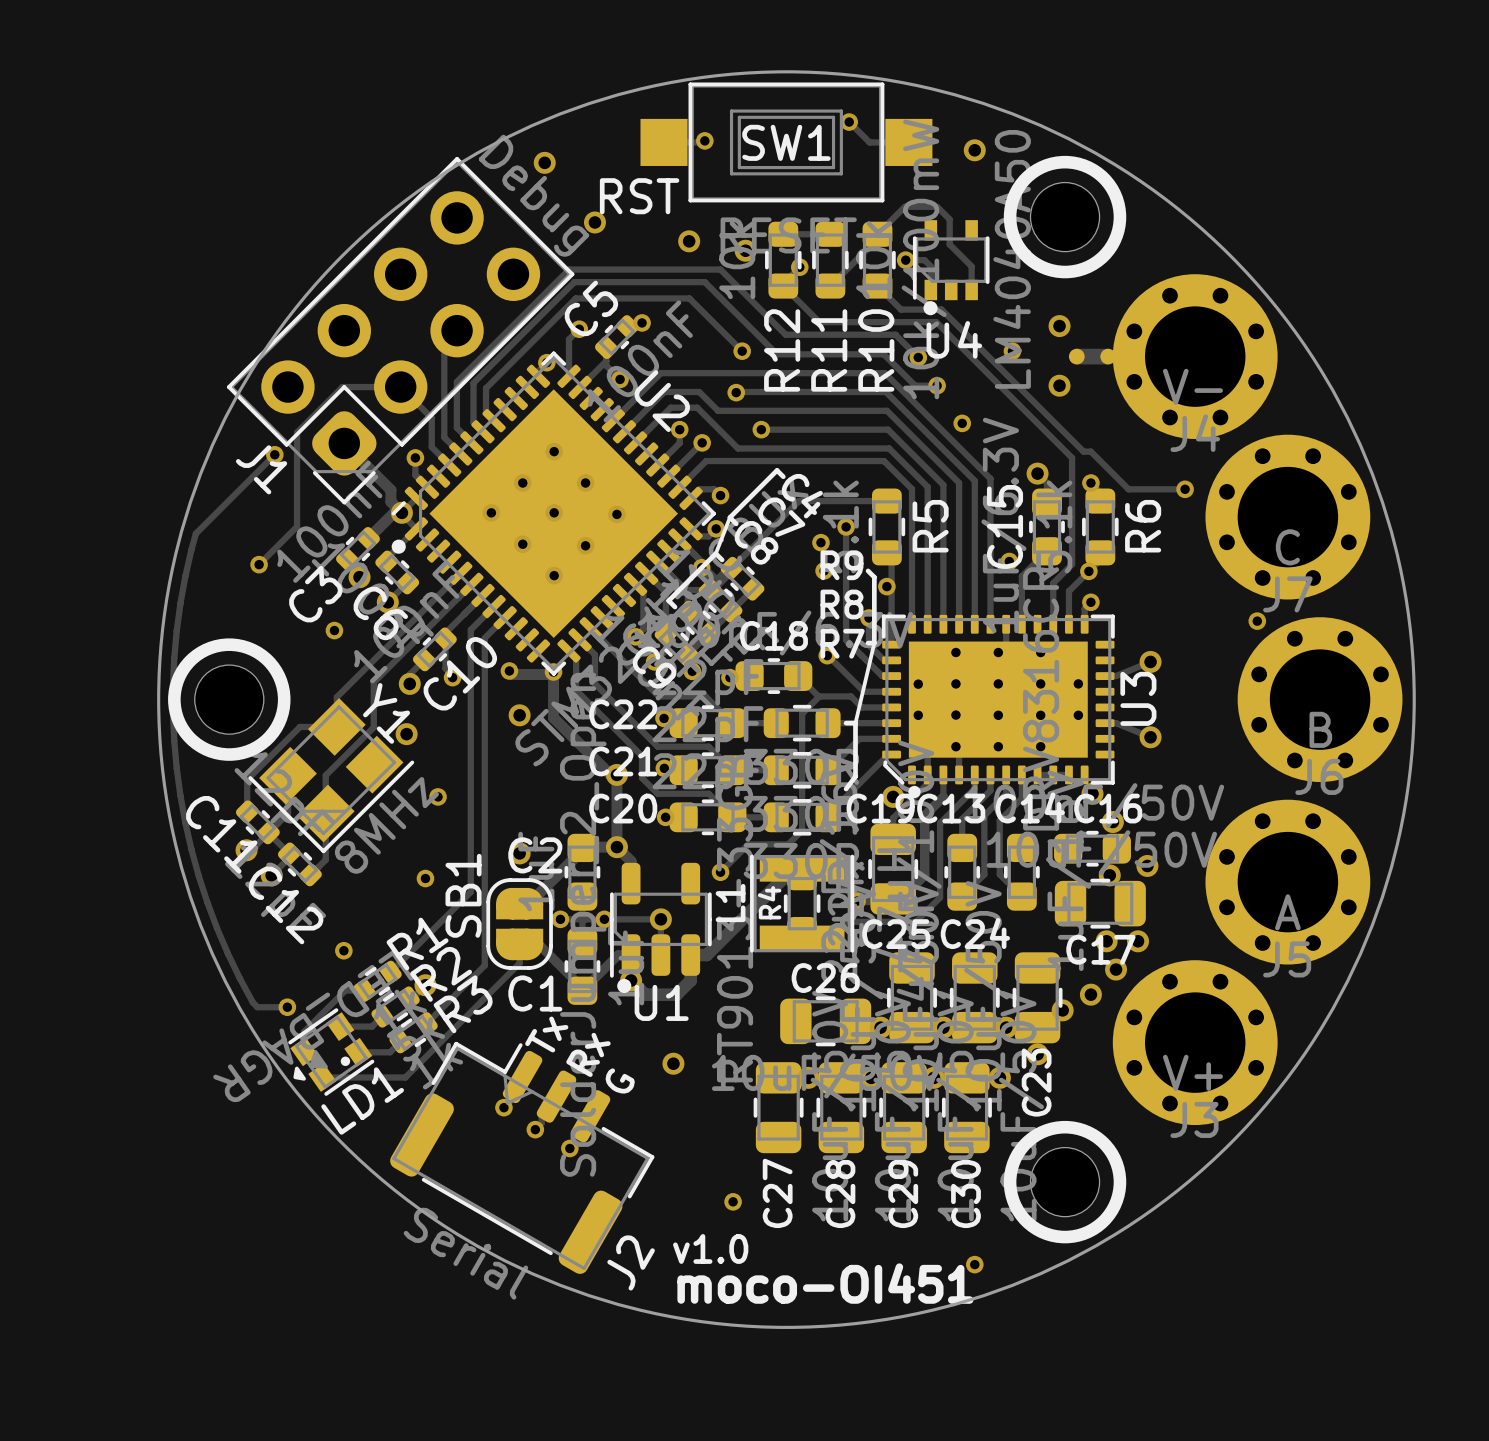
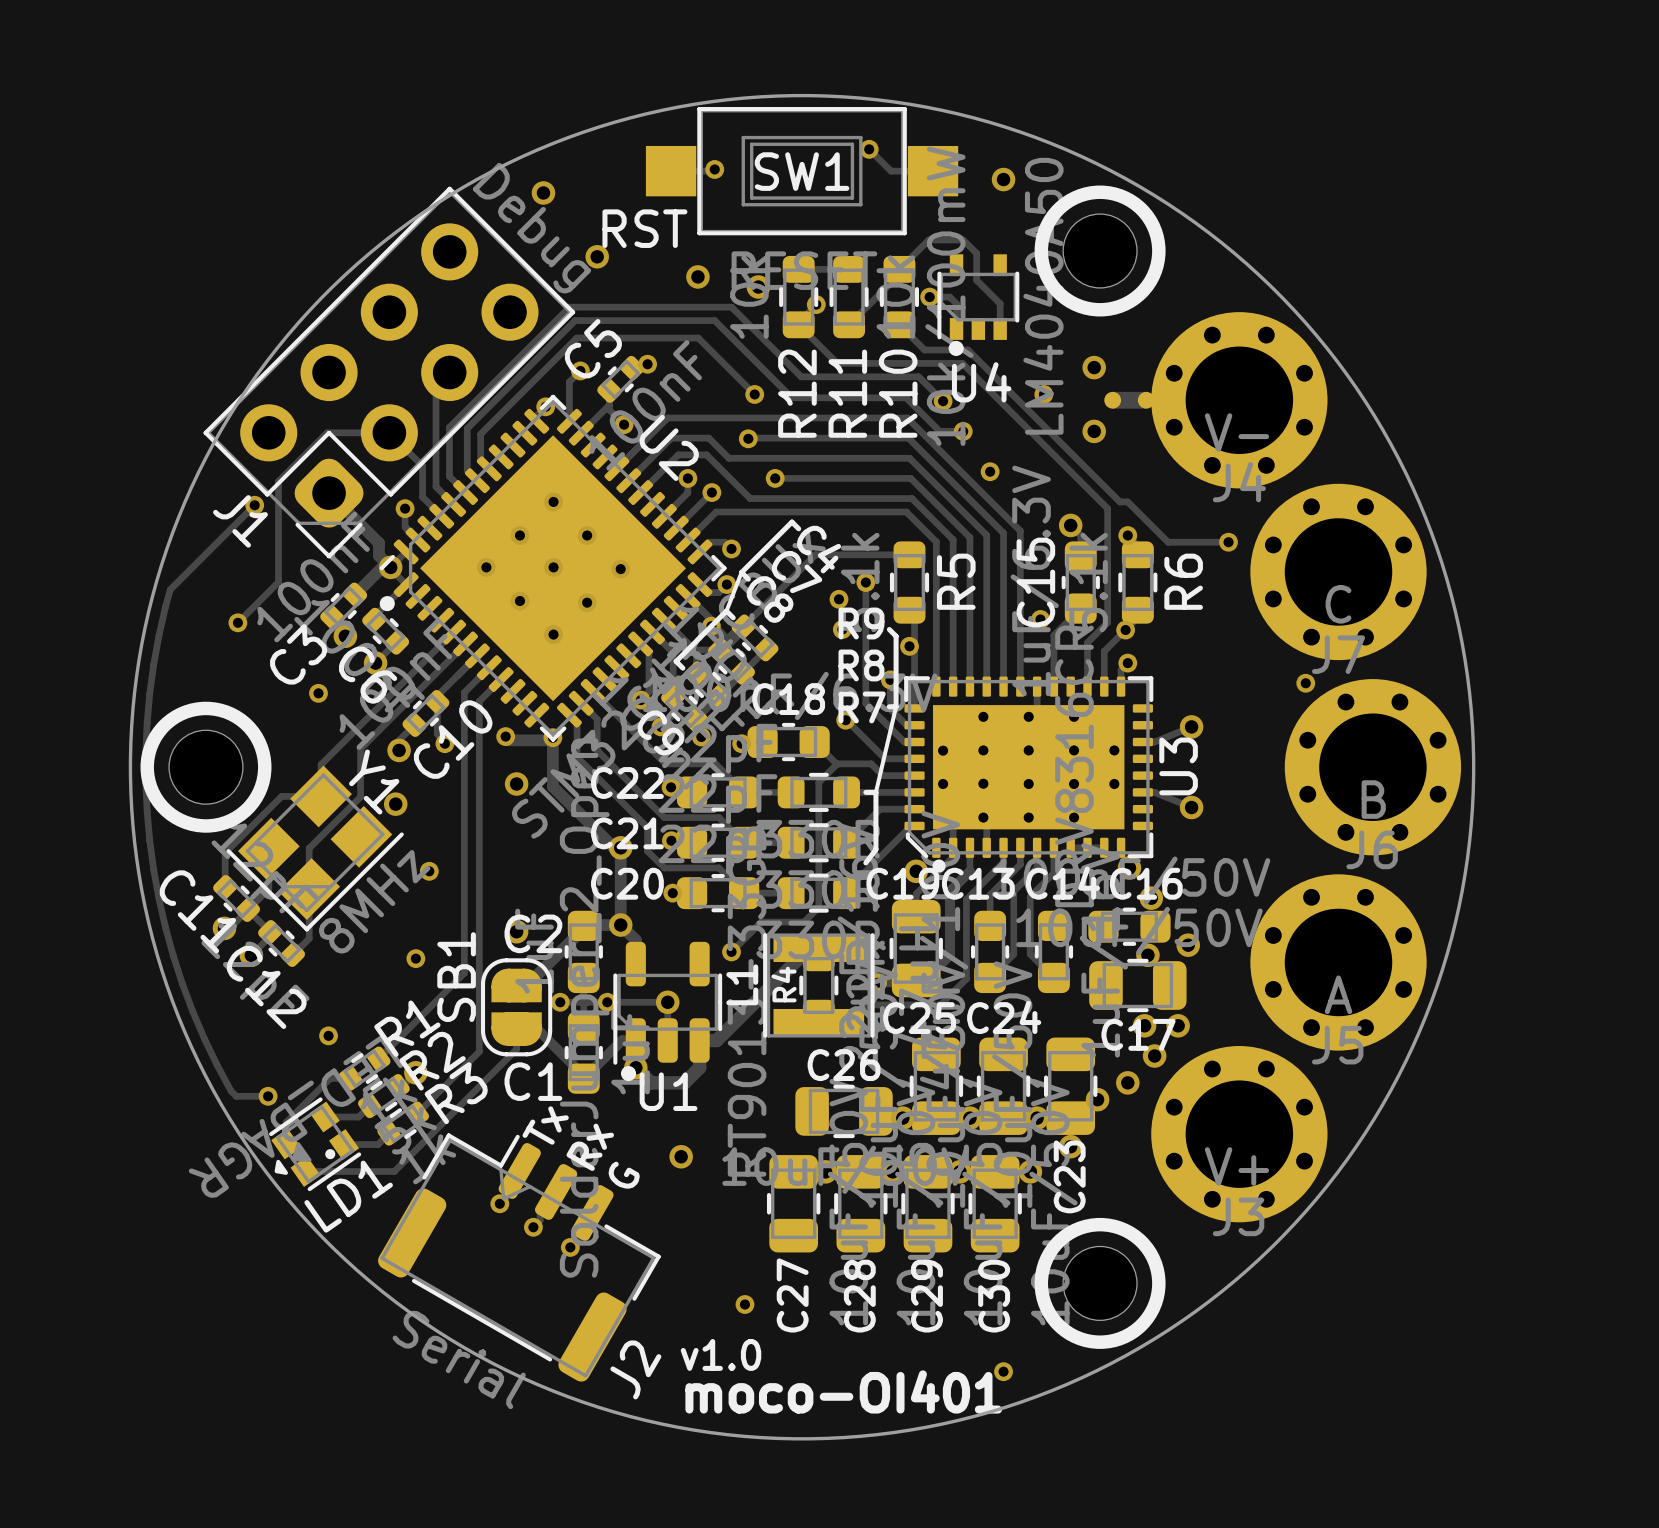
text: moco-OI451 (825, 1283) -> moco-OI401 (843, 1391)

